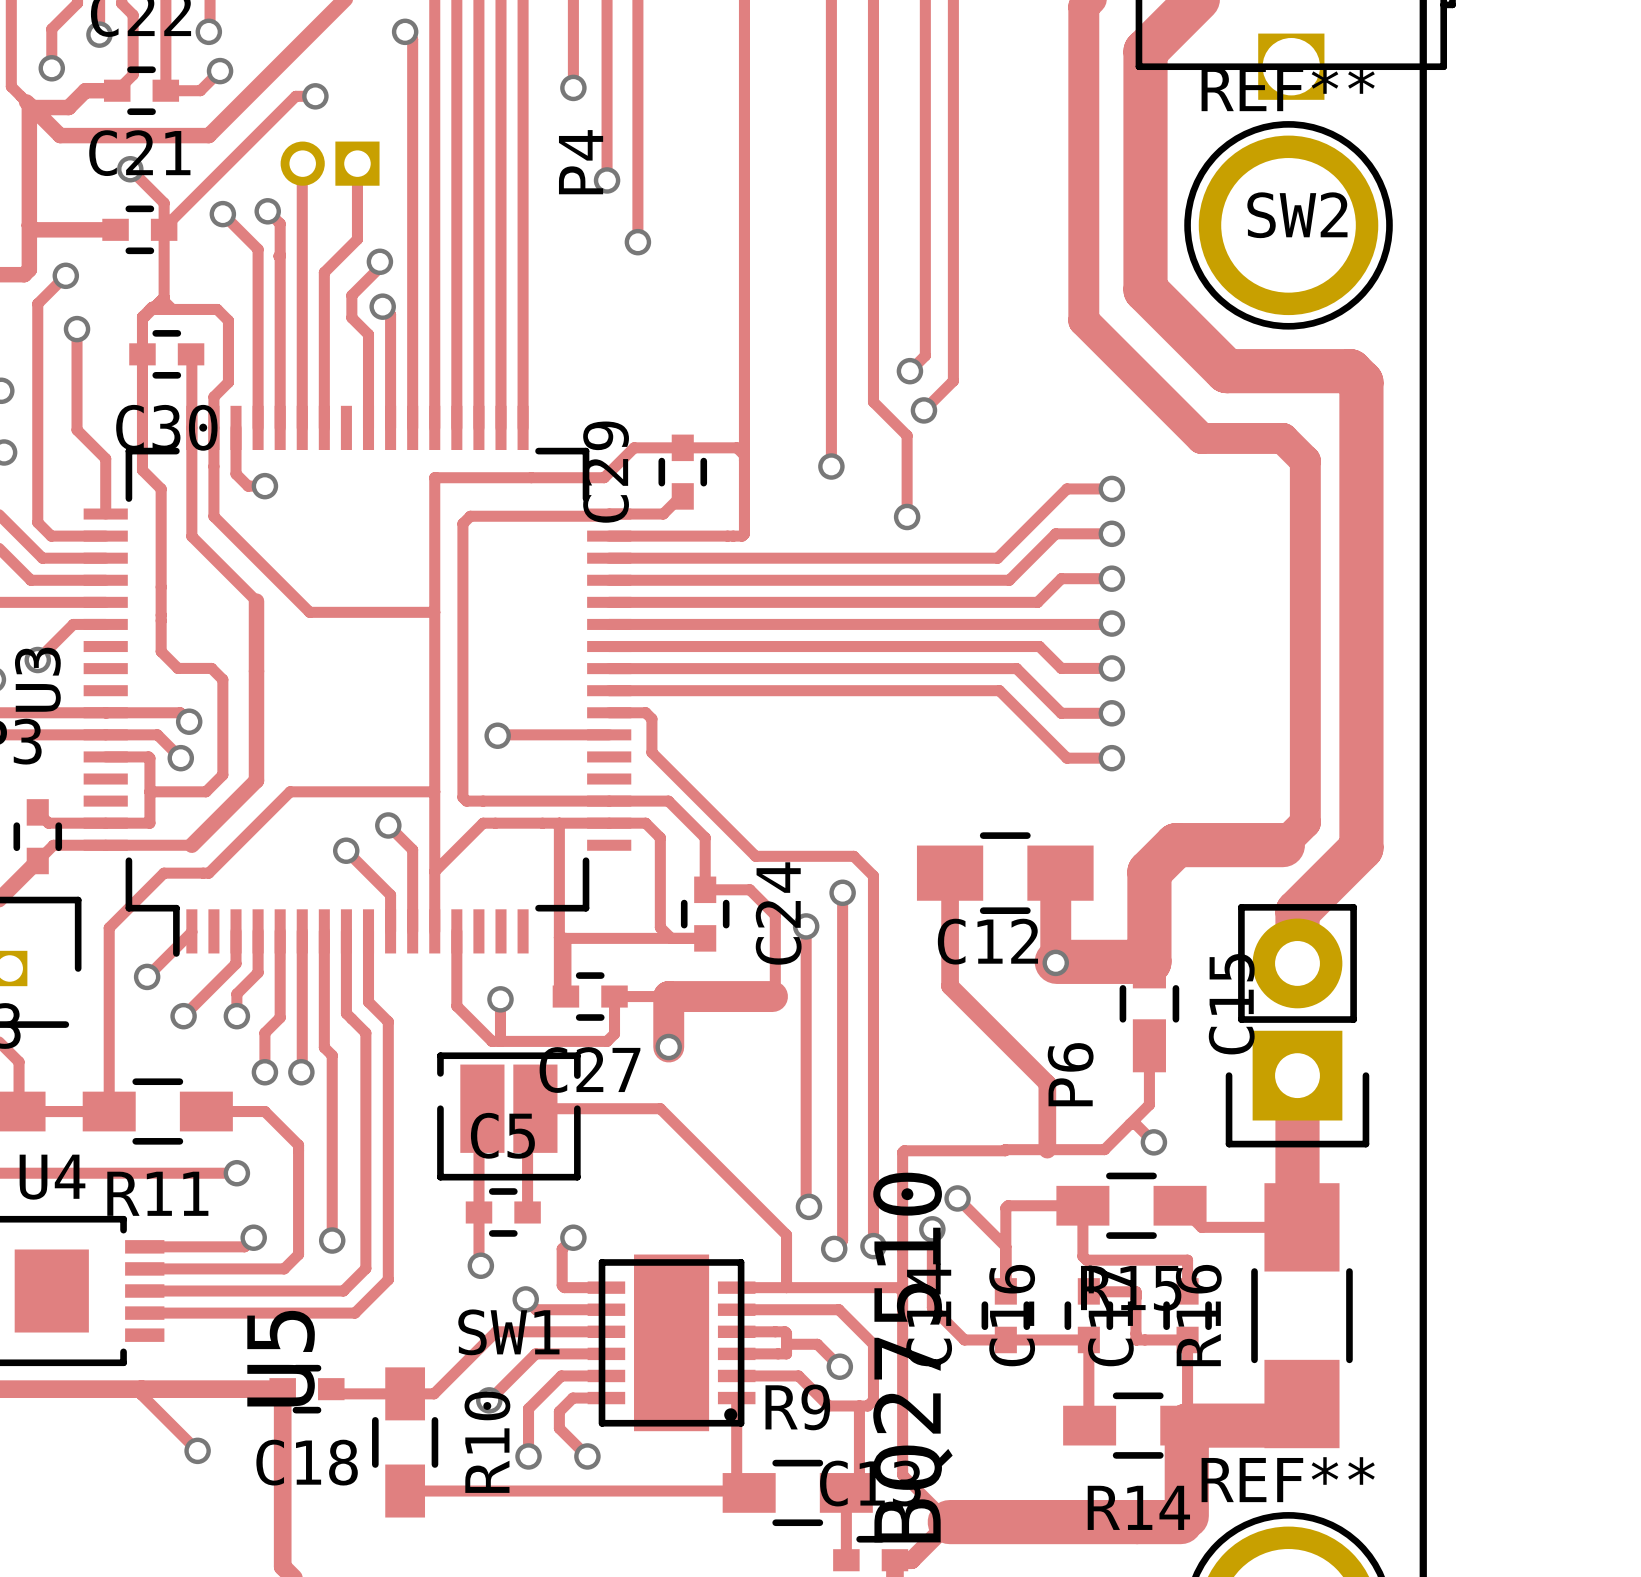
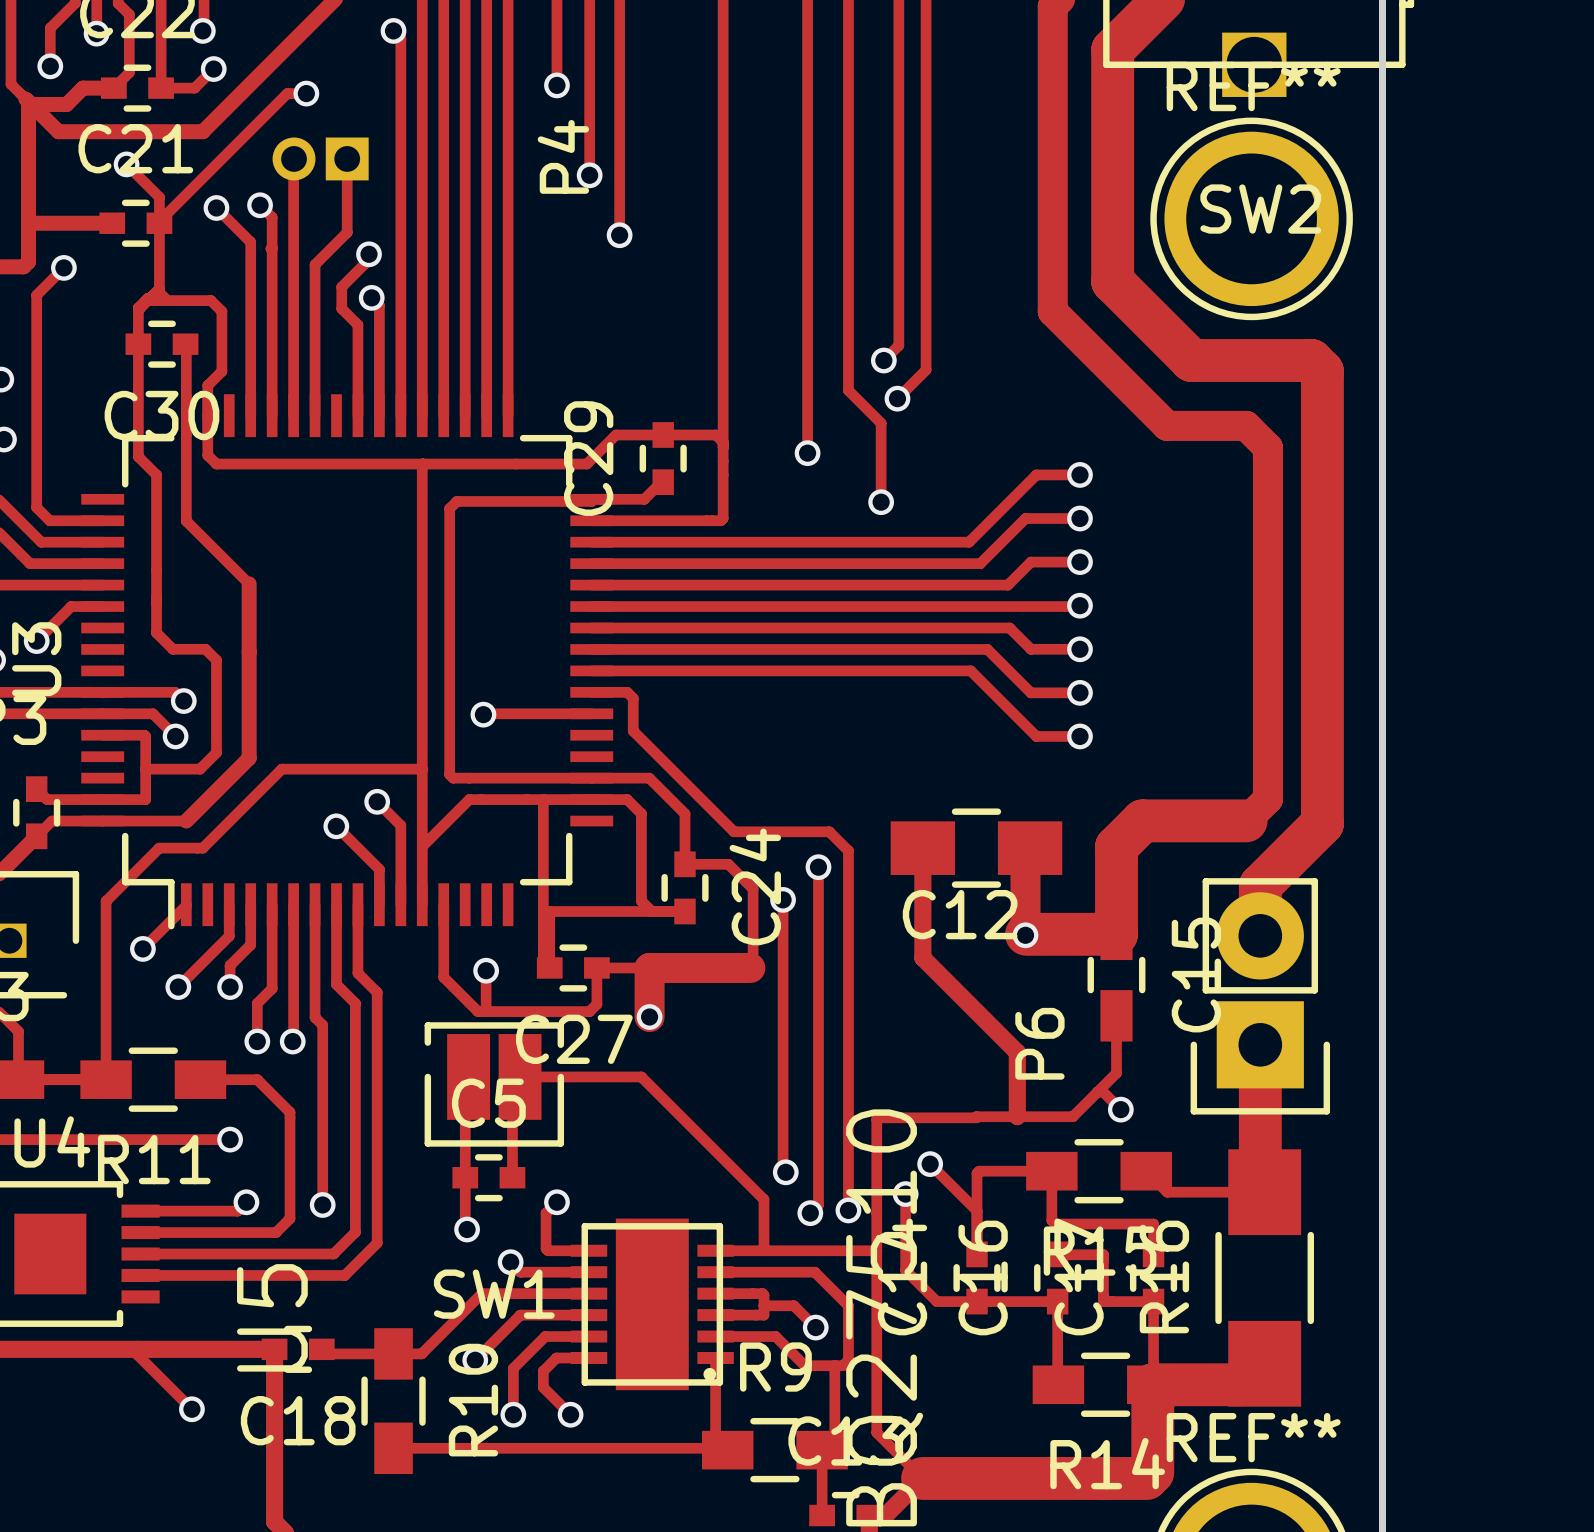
track: (77, 329) (77, 430) (105, 458) (105, 514) -> none
via: (77, 329) -> none
track: (236, 427) (236, 474) (248, 486) (264, 486) -> none
track: (213, 468) (213, 516) (309, 612) (434, 612) -> (207, 455) (216, 464) (423, 464)
via: (264, 486) -> none

